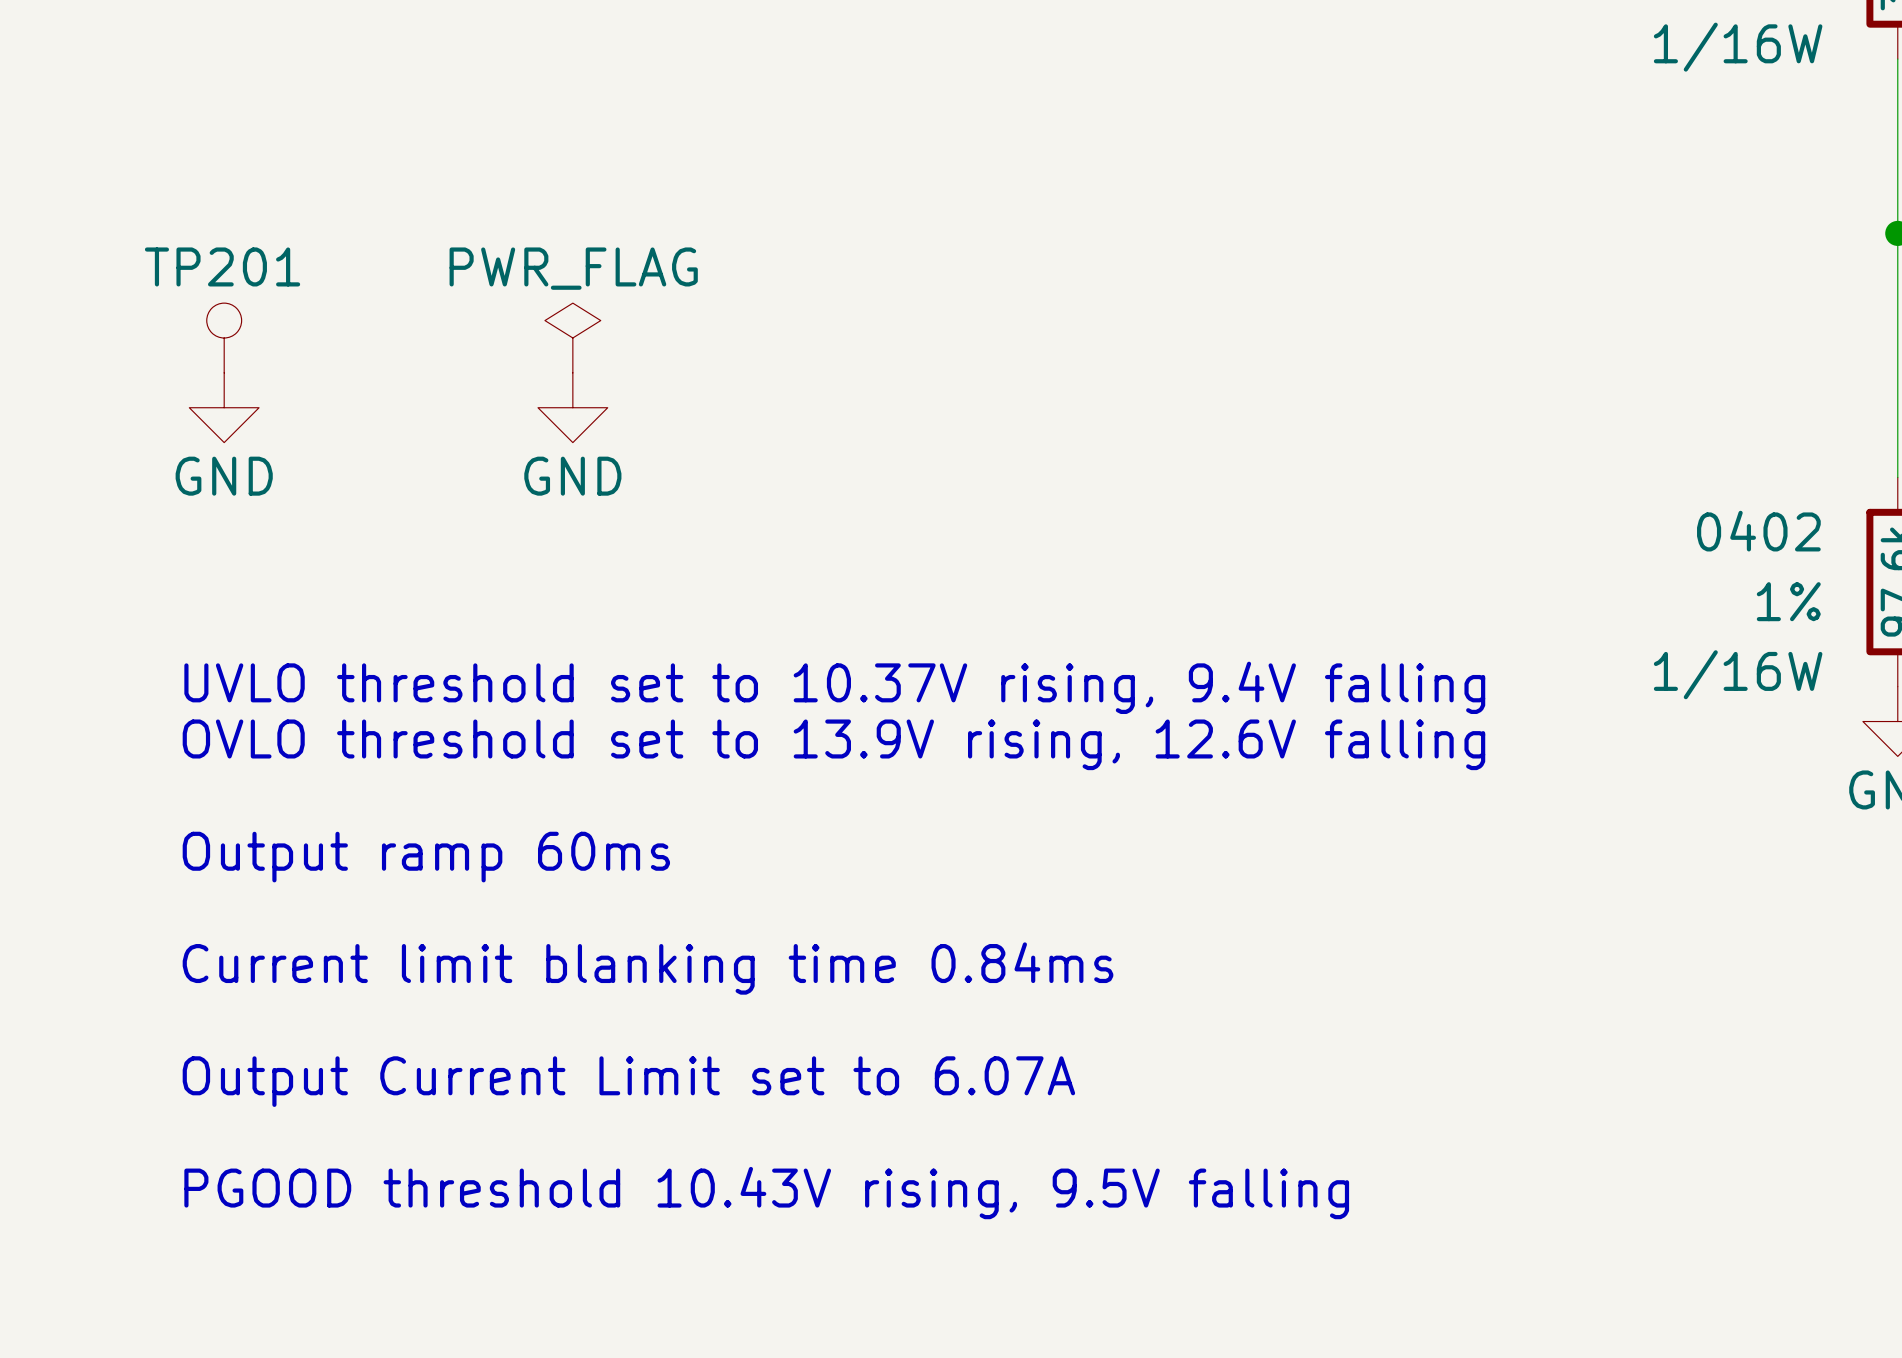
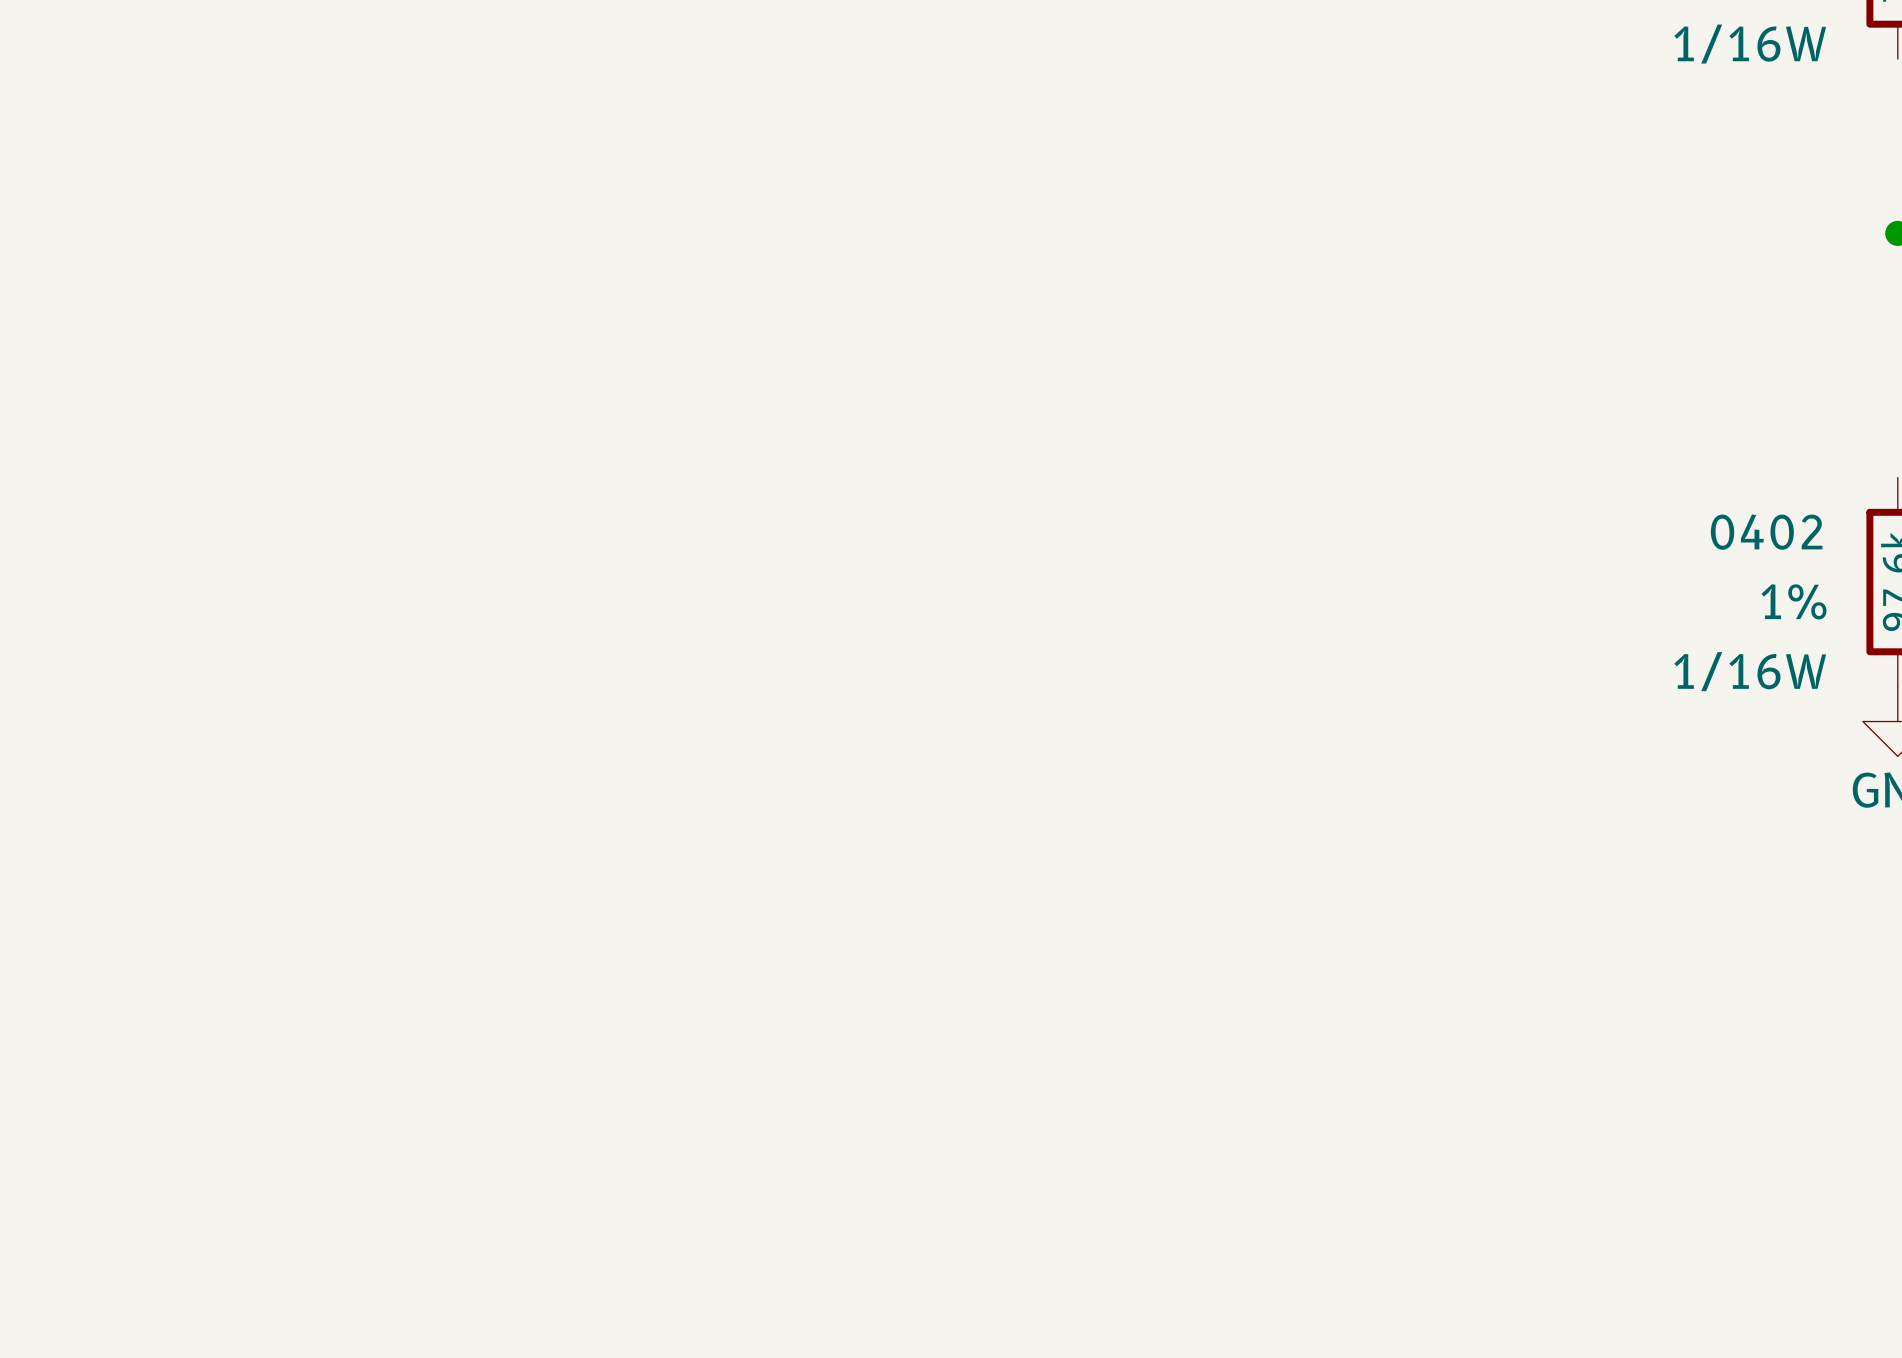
wire: (1897, 59) (1897, 477) -> none
TP201: (224, 338) -> none
power symbol: PWR_FLAG (572, 338) -> none
power symbol: GND (224, 407) -> none
power symbol: GND (572, 407) -> none
text: UVLO threshold set to 10.37V rising, 9.4V falling (834, 687) -> none
text: OVLO threshold set to 13.9V rising, 12.6V falling (833, 744) -> none
text: Output ramp 60ms (426, 857) -> none
text: Current limit blanking time 0.84ms (648, 968) -> none
text: Output Current Limit set to 6.07A (628, 1081) -> none
text: PGOOD threshold 10.43V rising, 9.5V falling (766, 1193) -> none

